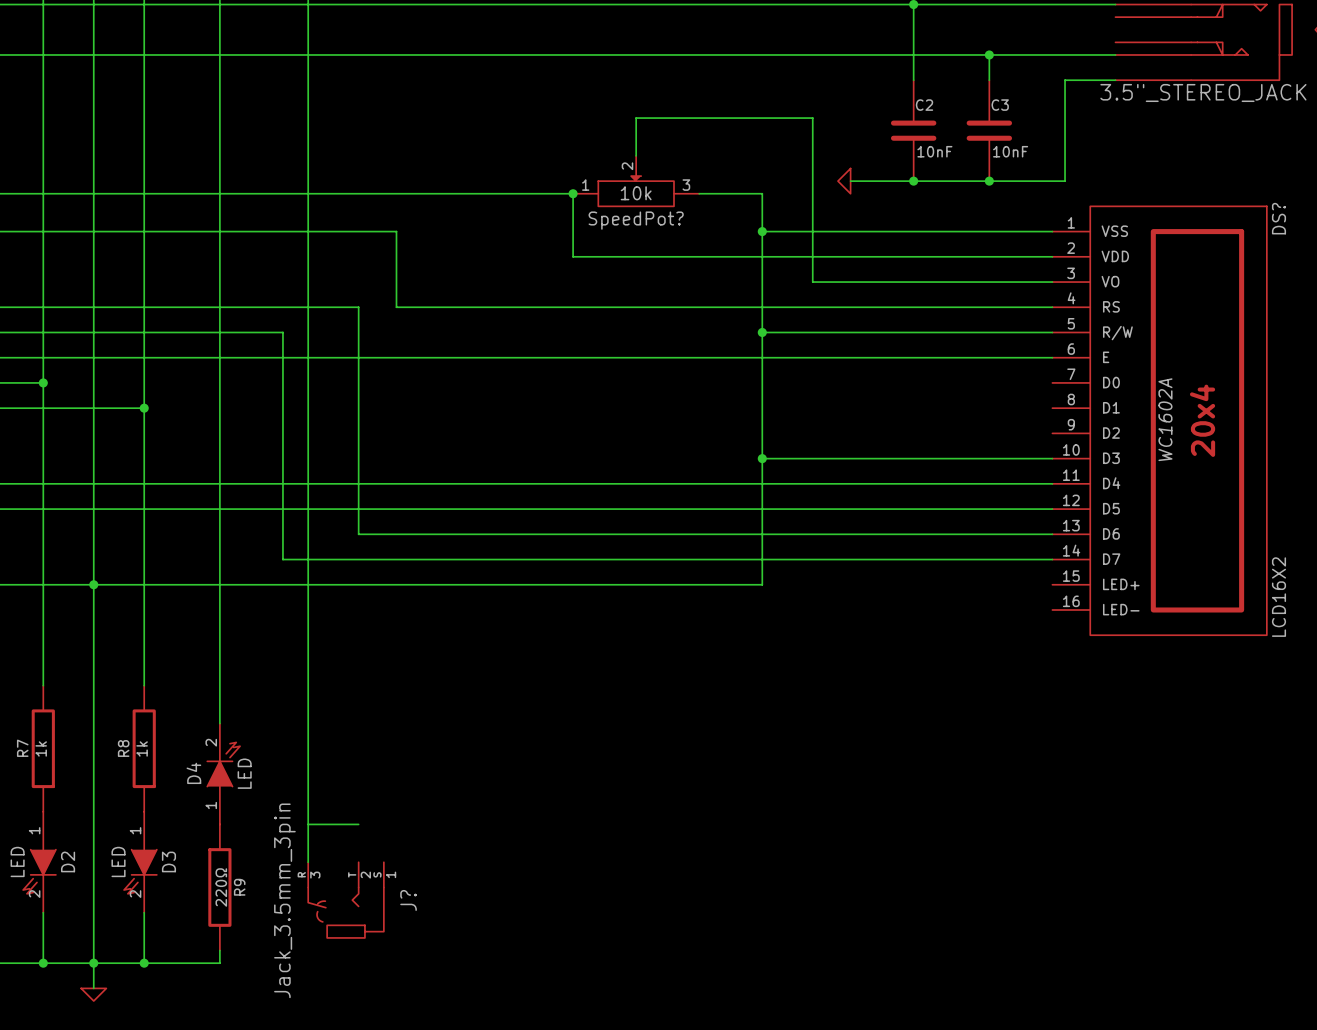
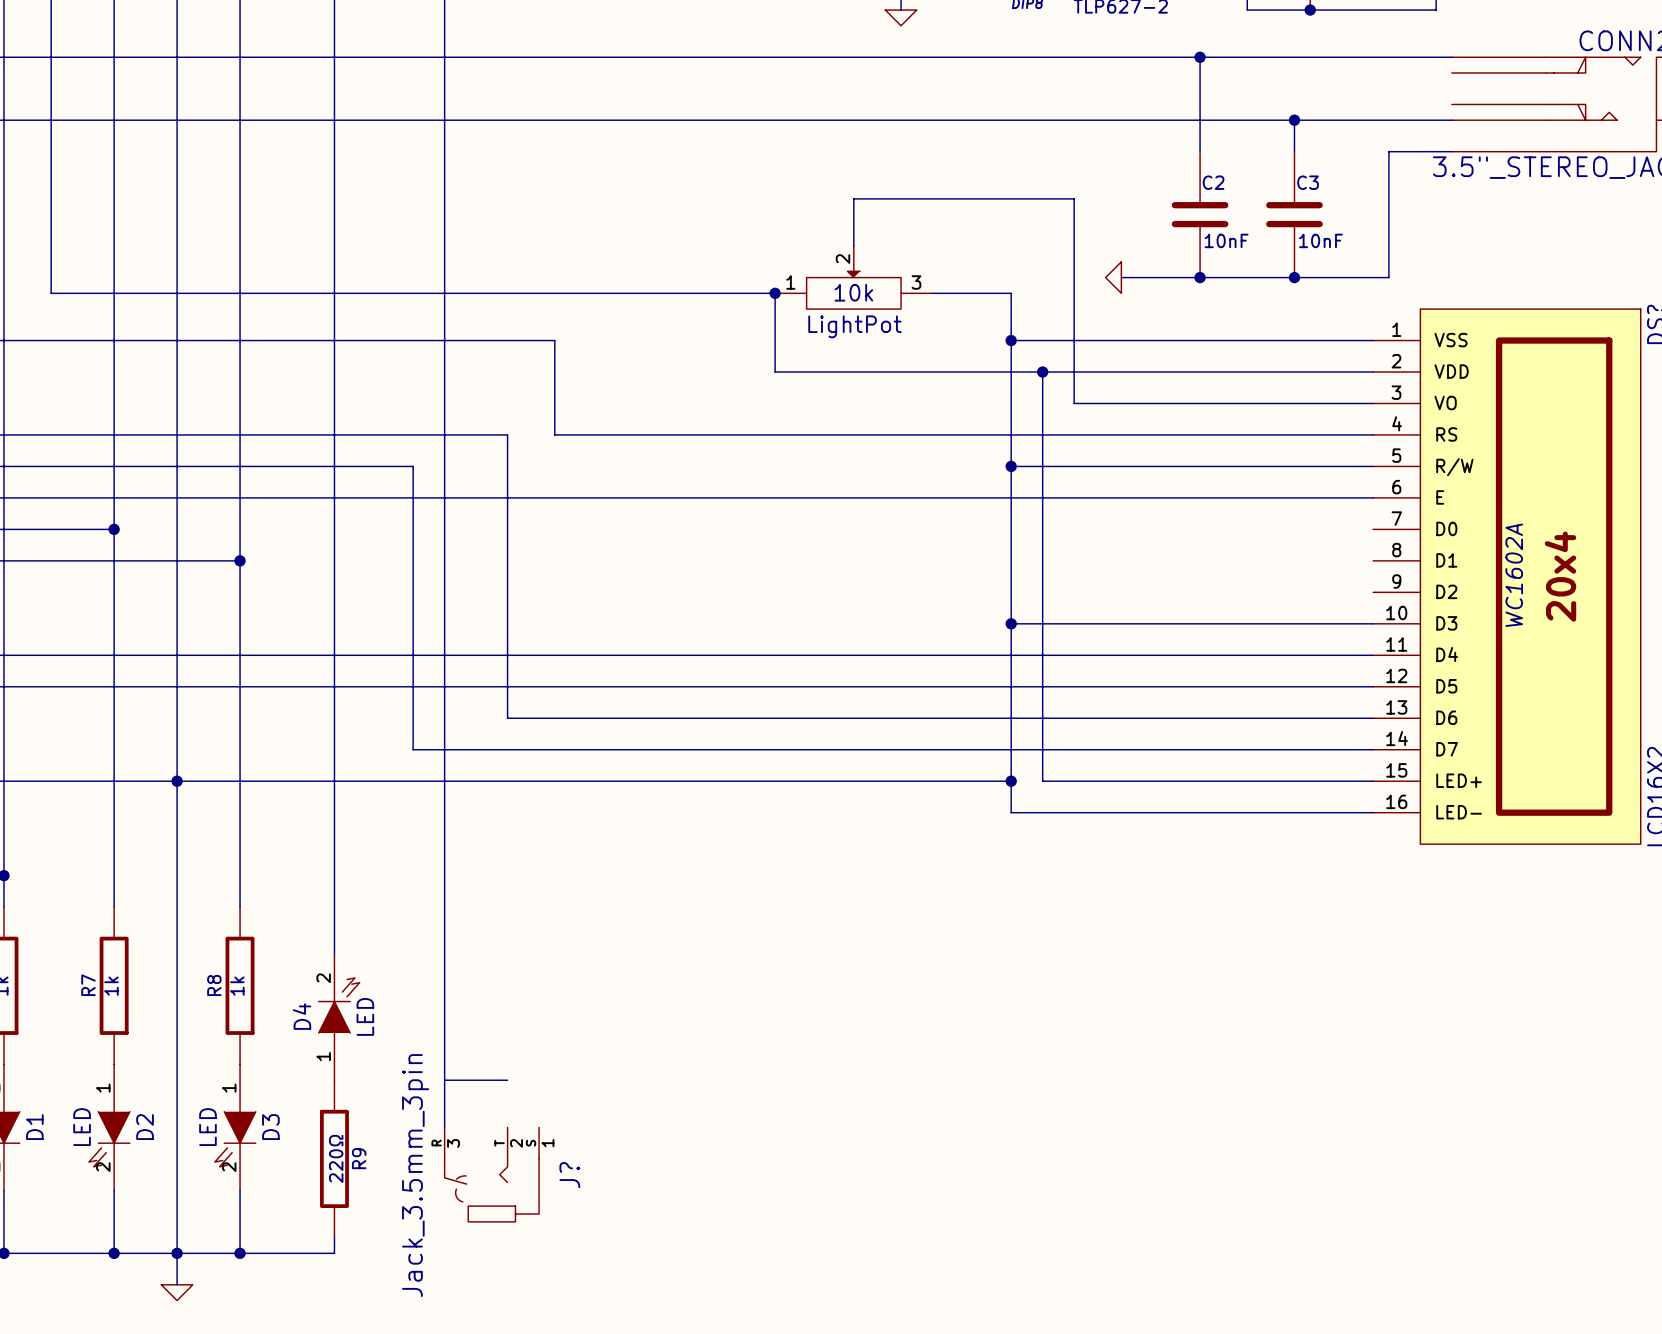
SpeedPot? name: SpeedPot? (636, 220) -> LightPot (854, 326)
wire: none -> (1042, 372) (1042, 781) (1373, 781)
junction: none -> (1042, 372)
wire: none -> (1011, 781) (1011, 812) (1373, 812)
junction: none -> (1011, 781)

